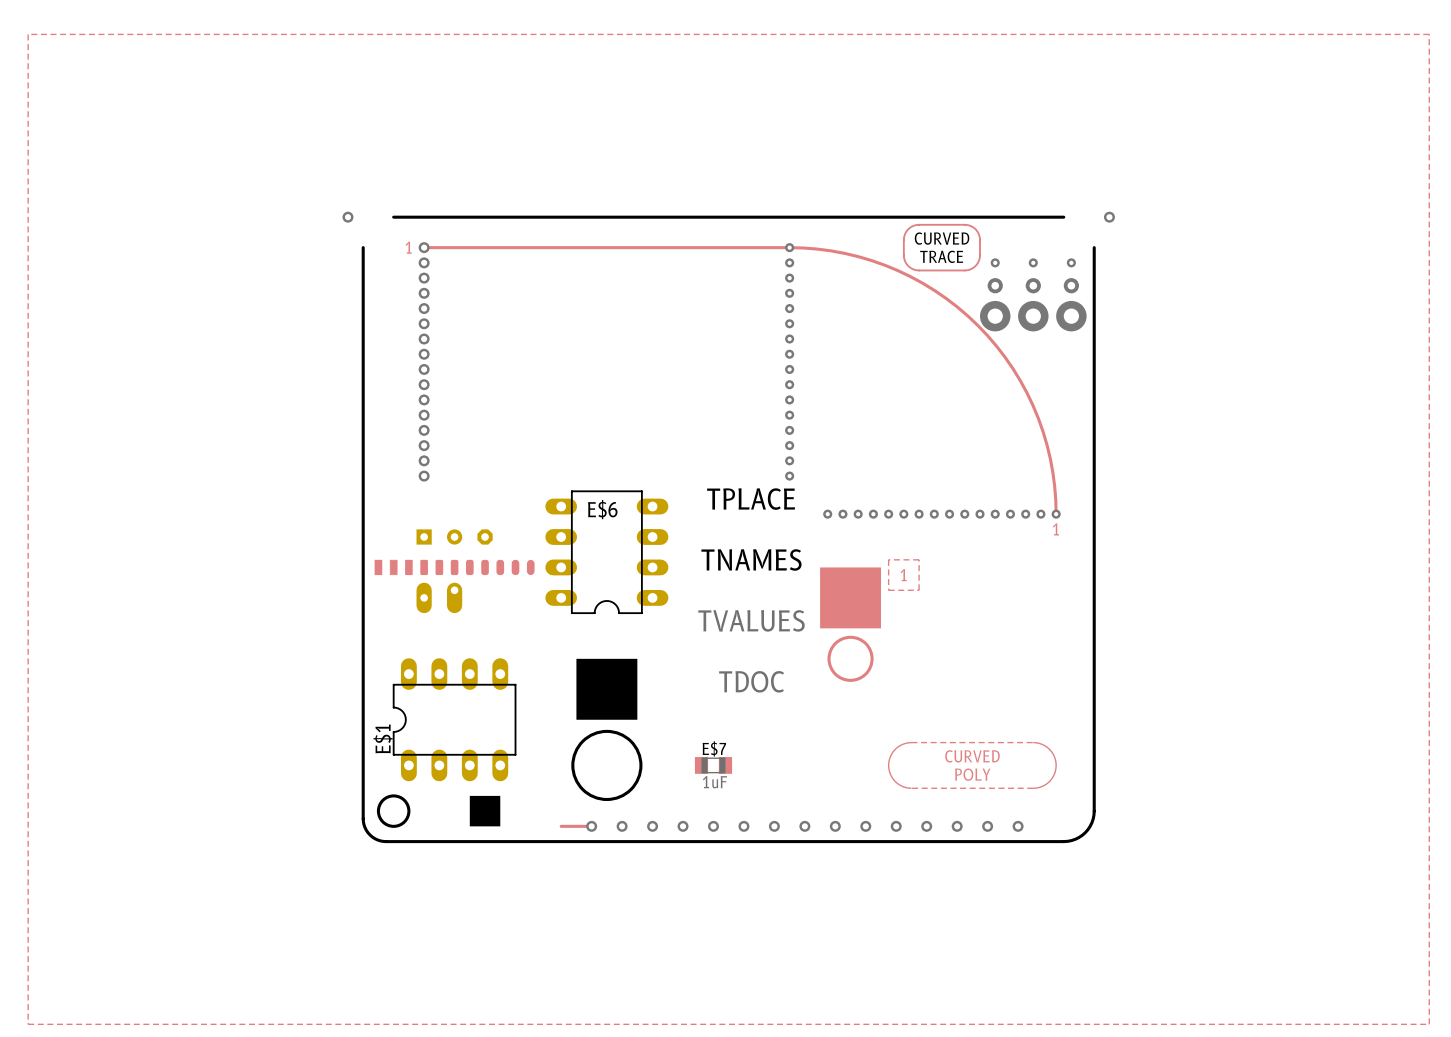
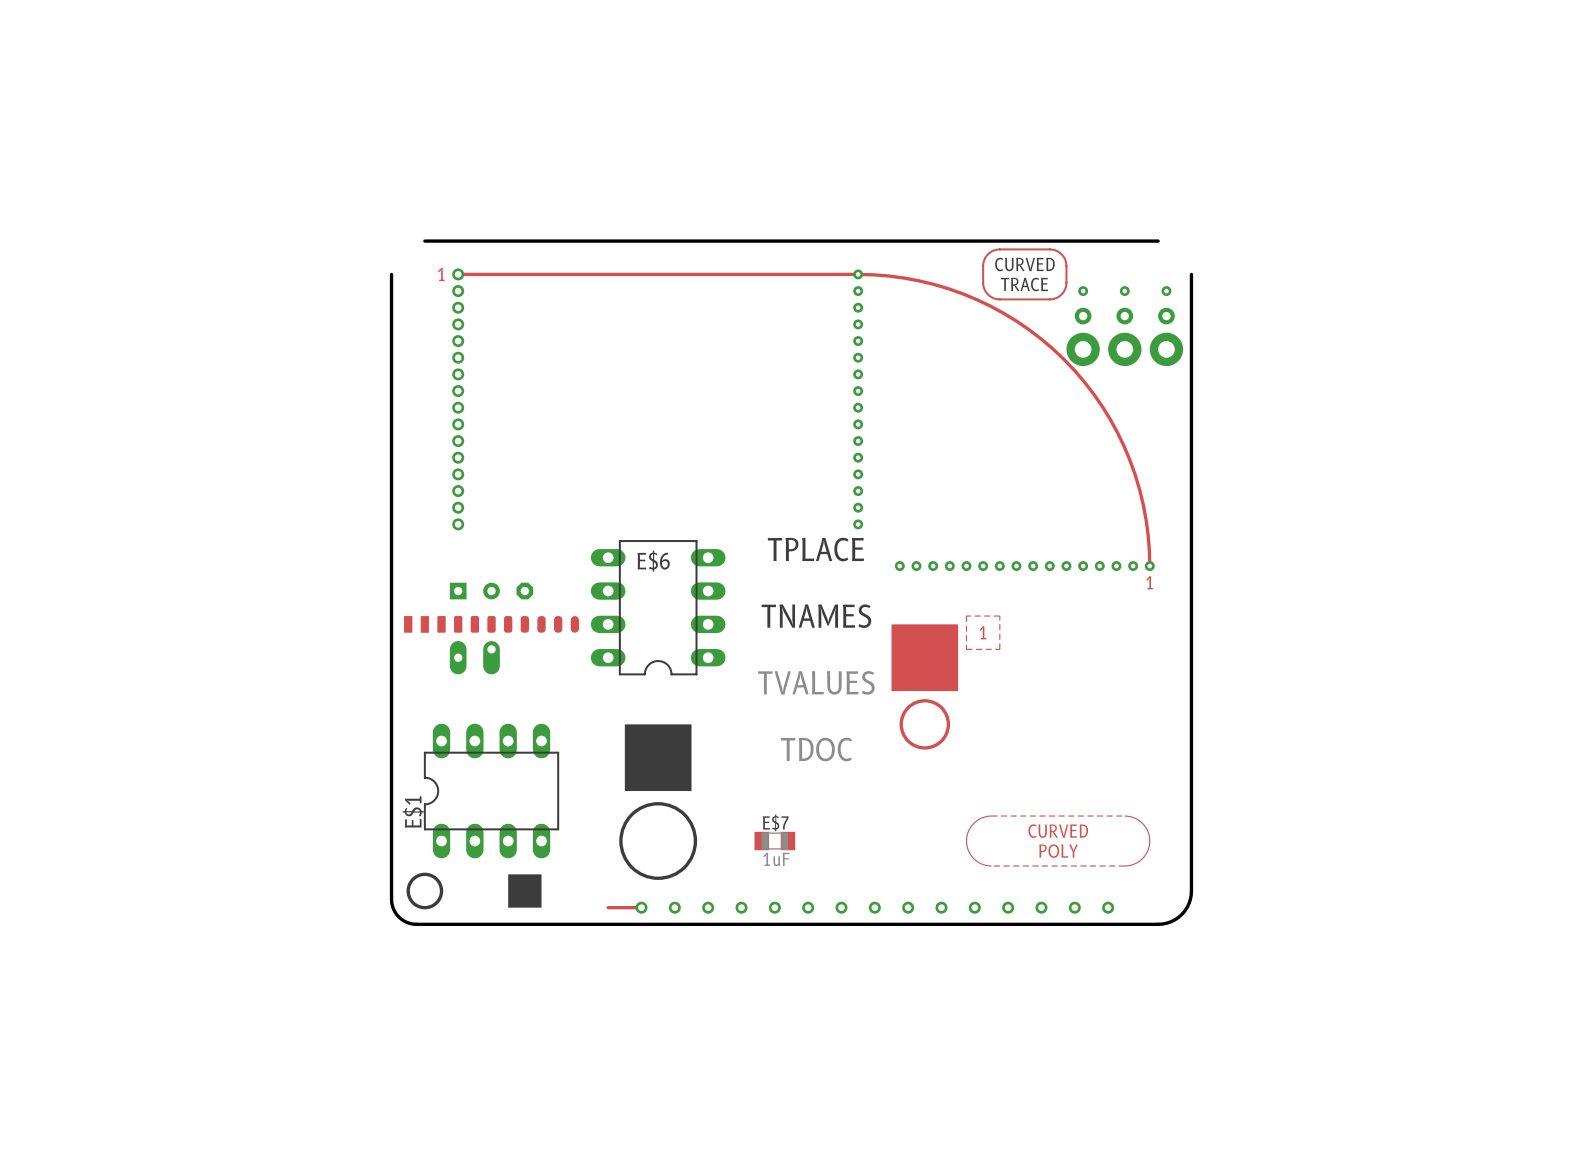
zone outline: (28, 34) (28, 1024) (1429, 1024) (1429, 34) (28, 34) -> none
via: (347, 217) -> none
via: (1109, 217) -> none

